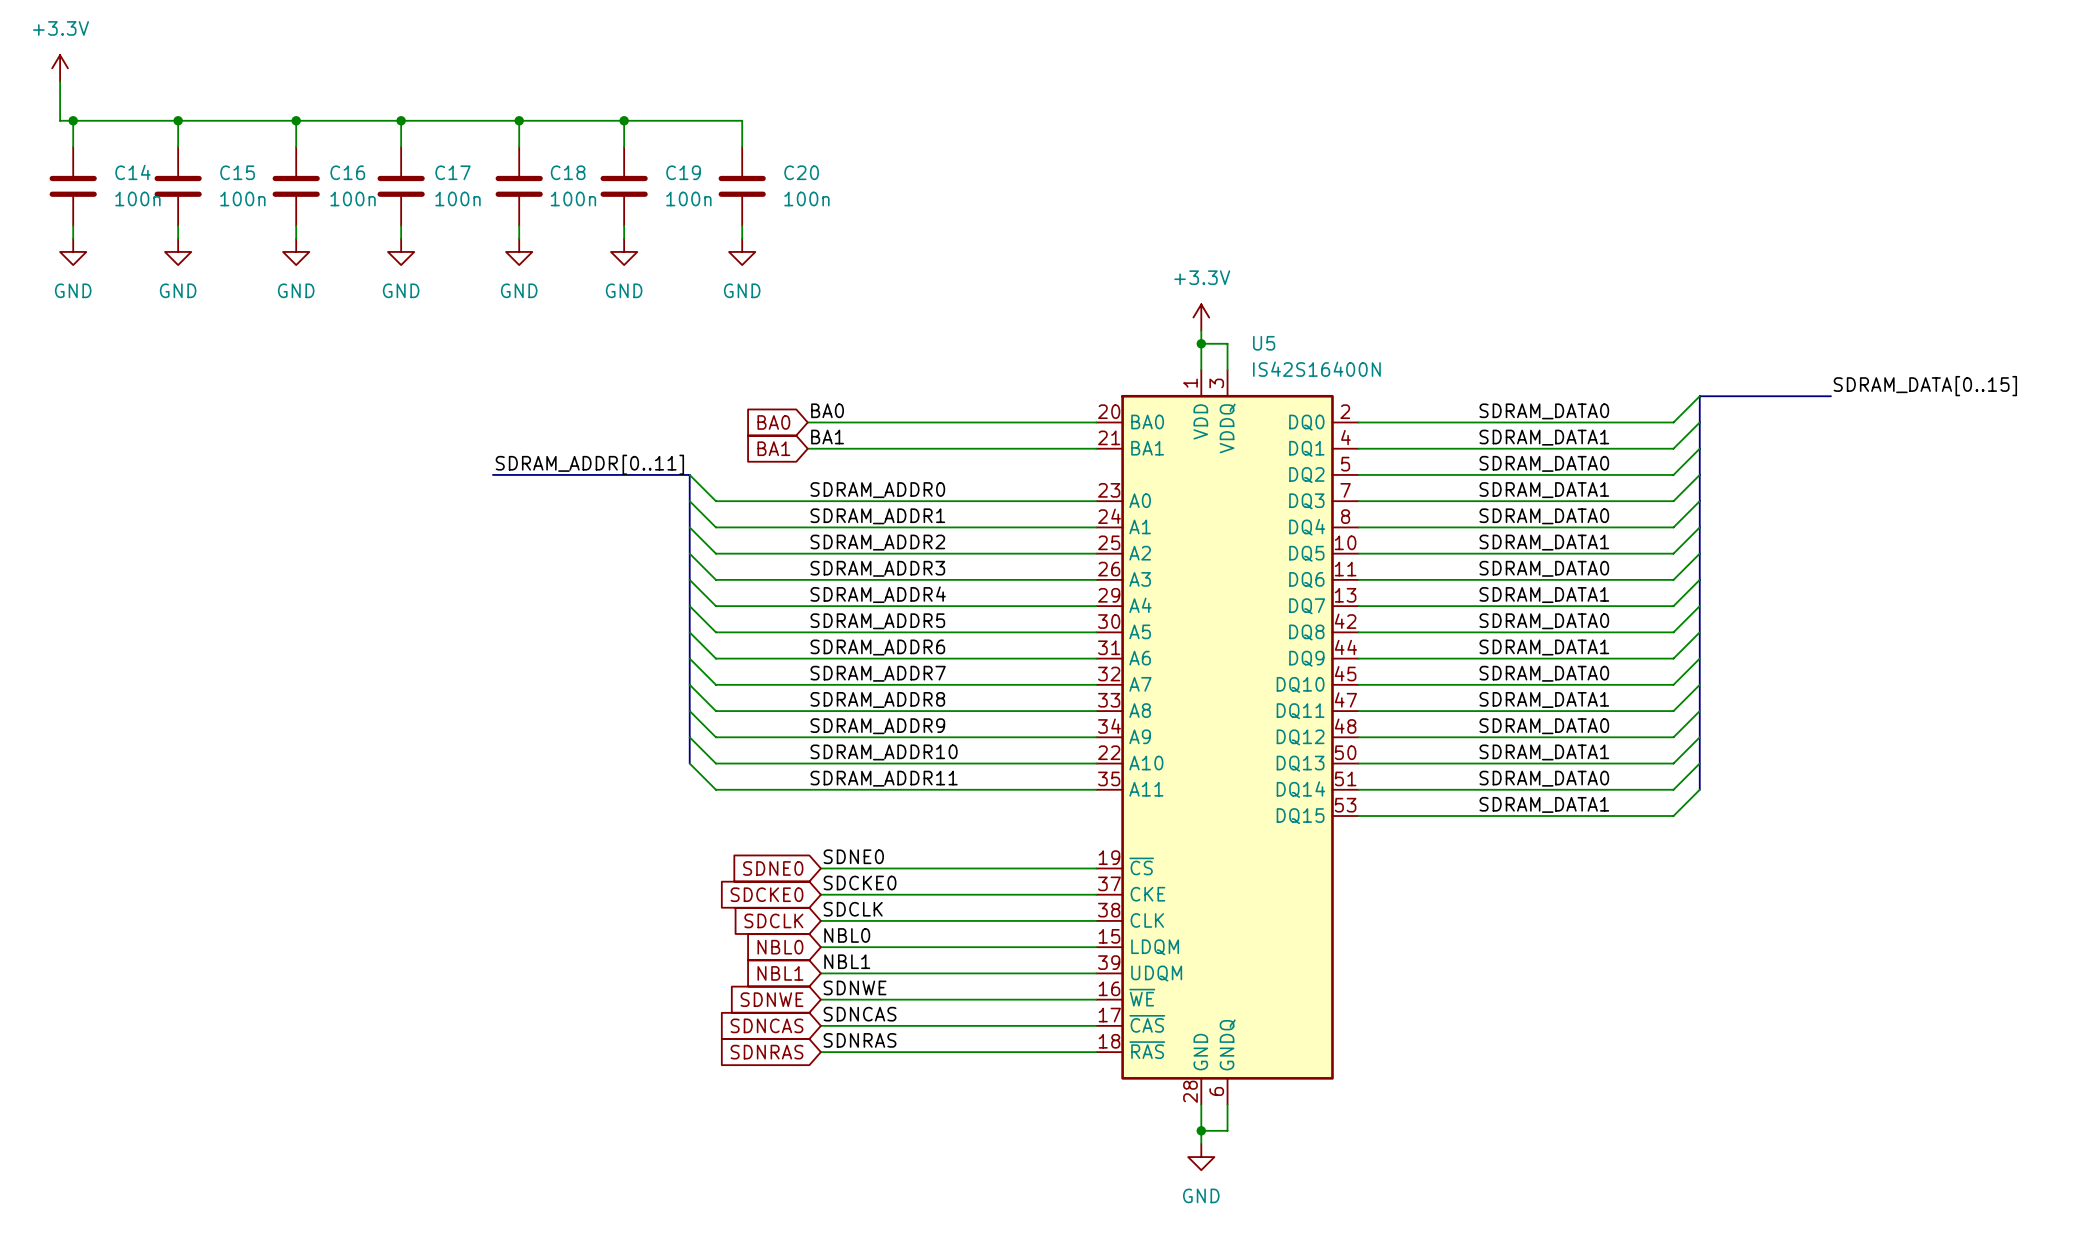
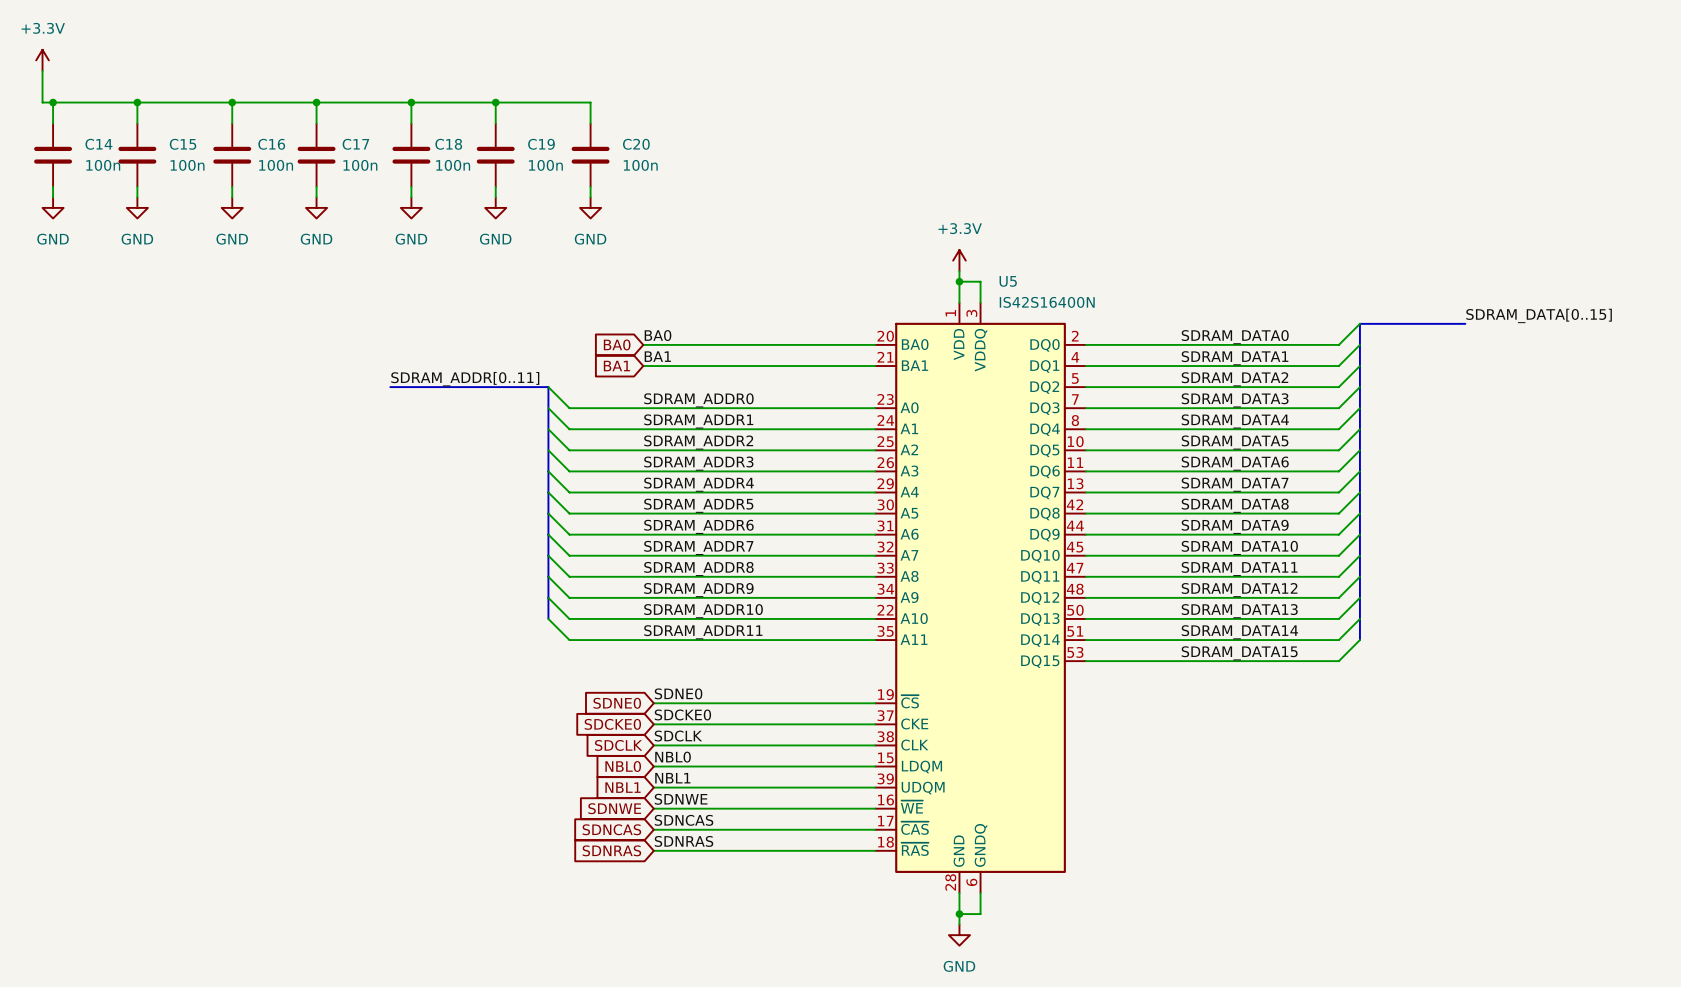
label: SDRAM_DATA0 (1544, 463) -> SDRAM_DATA2 (1234, 379)
label: SDRAM_DATA1 (1544, 490) -> SDRAM_DATA3 (1235, 400)
label: SDRAM_DATA0 (1544, 516) -> SDRAM_DATA4 (1235, 421)
label: SDRAM_DATA1 (1544, 542) -> SDRAM_DATA5 (1235, 442)
label: SDRAM_DATA0 (1544, 568) -> SDRAM_DATA6 (1235, 463)
label: SDRAM_DATA1 (1544, 595) -> SDRAM_DATA7 (1235, 484)
label: SDRAM_DATA0 (1544, 621) -> SDRAM_DATA8 (1235, 505)
label: SDRAM_DATA1 (1544, 647) -> SDRAM_DATA9 (1235, 526)
label: SDRAM_DATA0 (1544, 673) -> SDRAM_DATA10 (1239, 547)
label: SDRAM_DATA1 (1544, 699) -> SDRAM_DATA11 (1239, 569)
label: SDRAM_DATA0 (1544, 726) -> SDRAM_DATA12 (1239, 590)
label: SDRAM_DATA1 (1544, 752) -> SDRAM_DATA13 (1239, 611)
label: SDRAM_DATA0 (1544, 778) -> SDRAM_DATA14 (1239, 632)
label: SDRAM_DATA1 (1544, 804) -> SDRAM_DATA15 (1239, 653)

